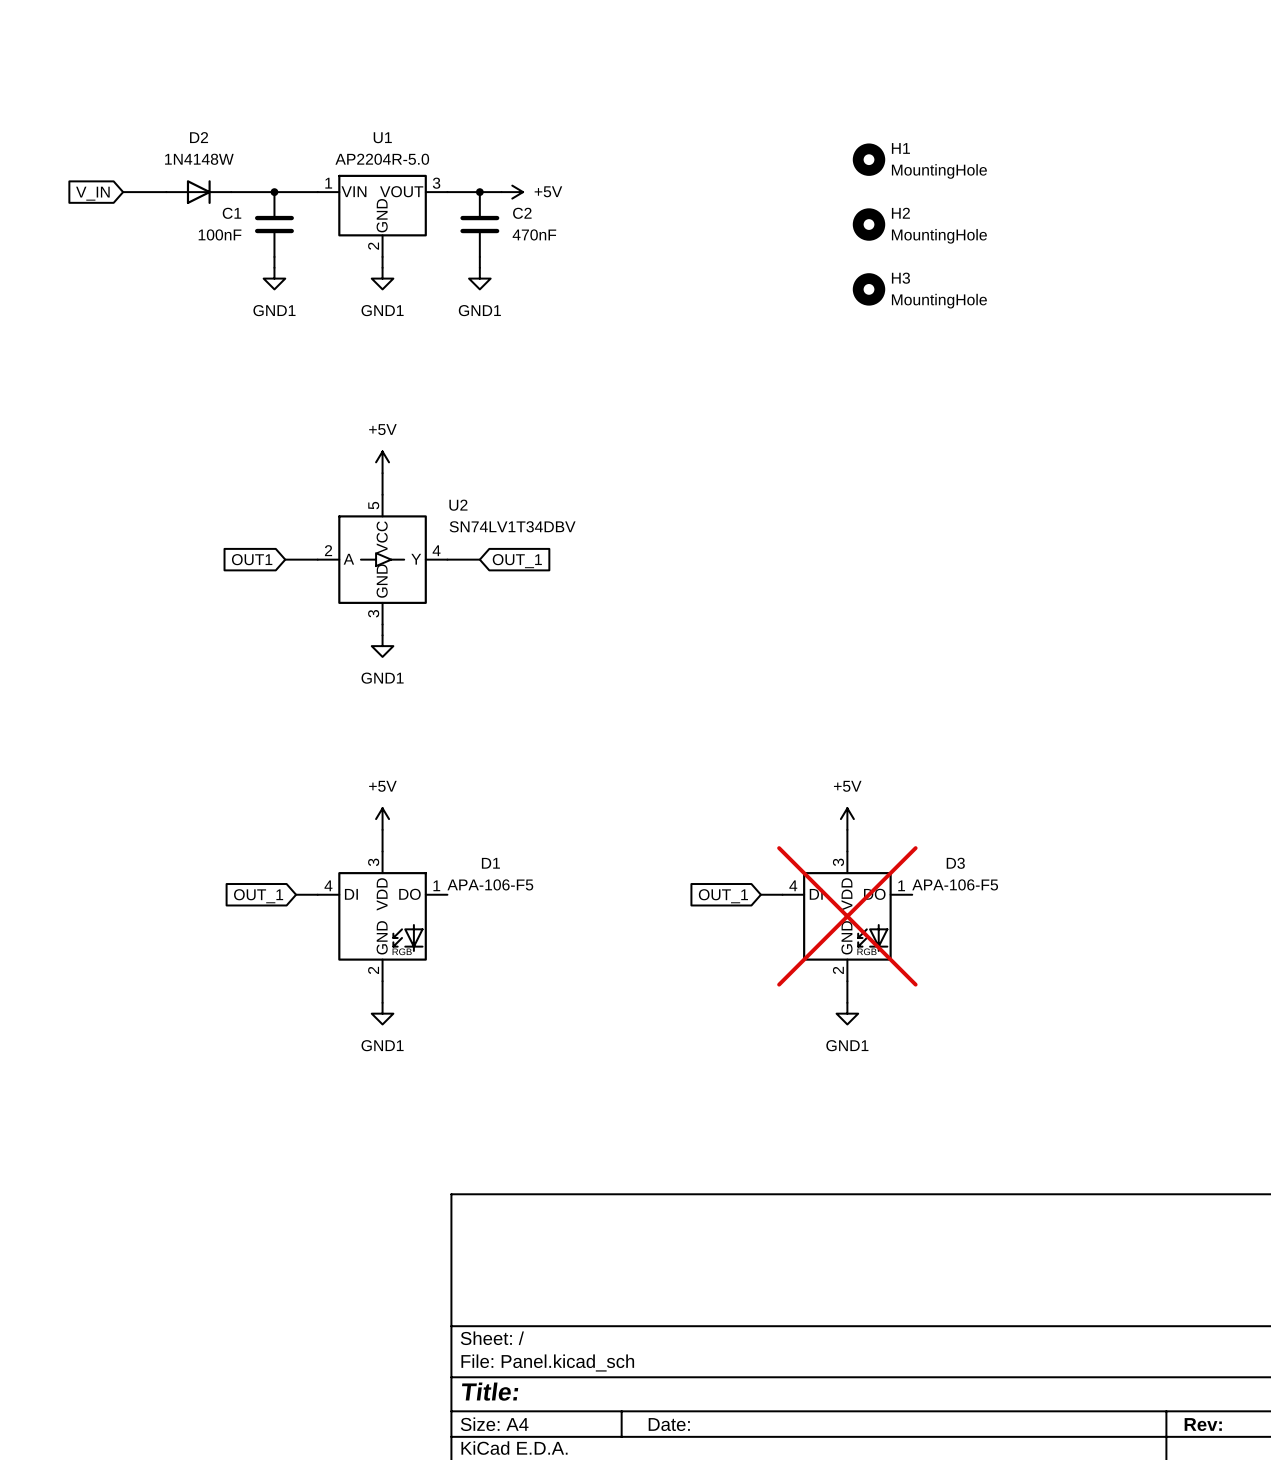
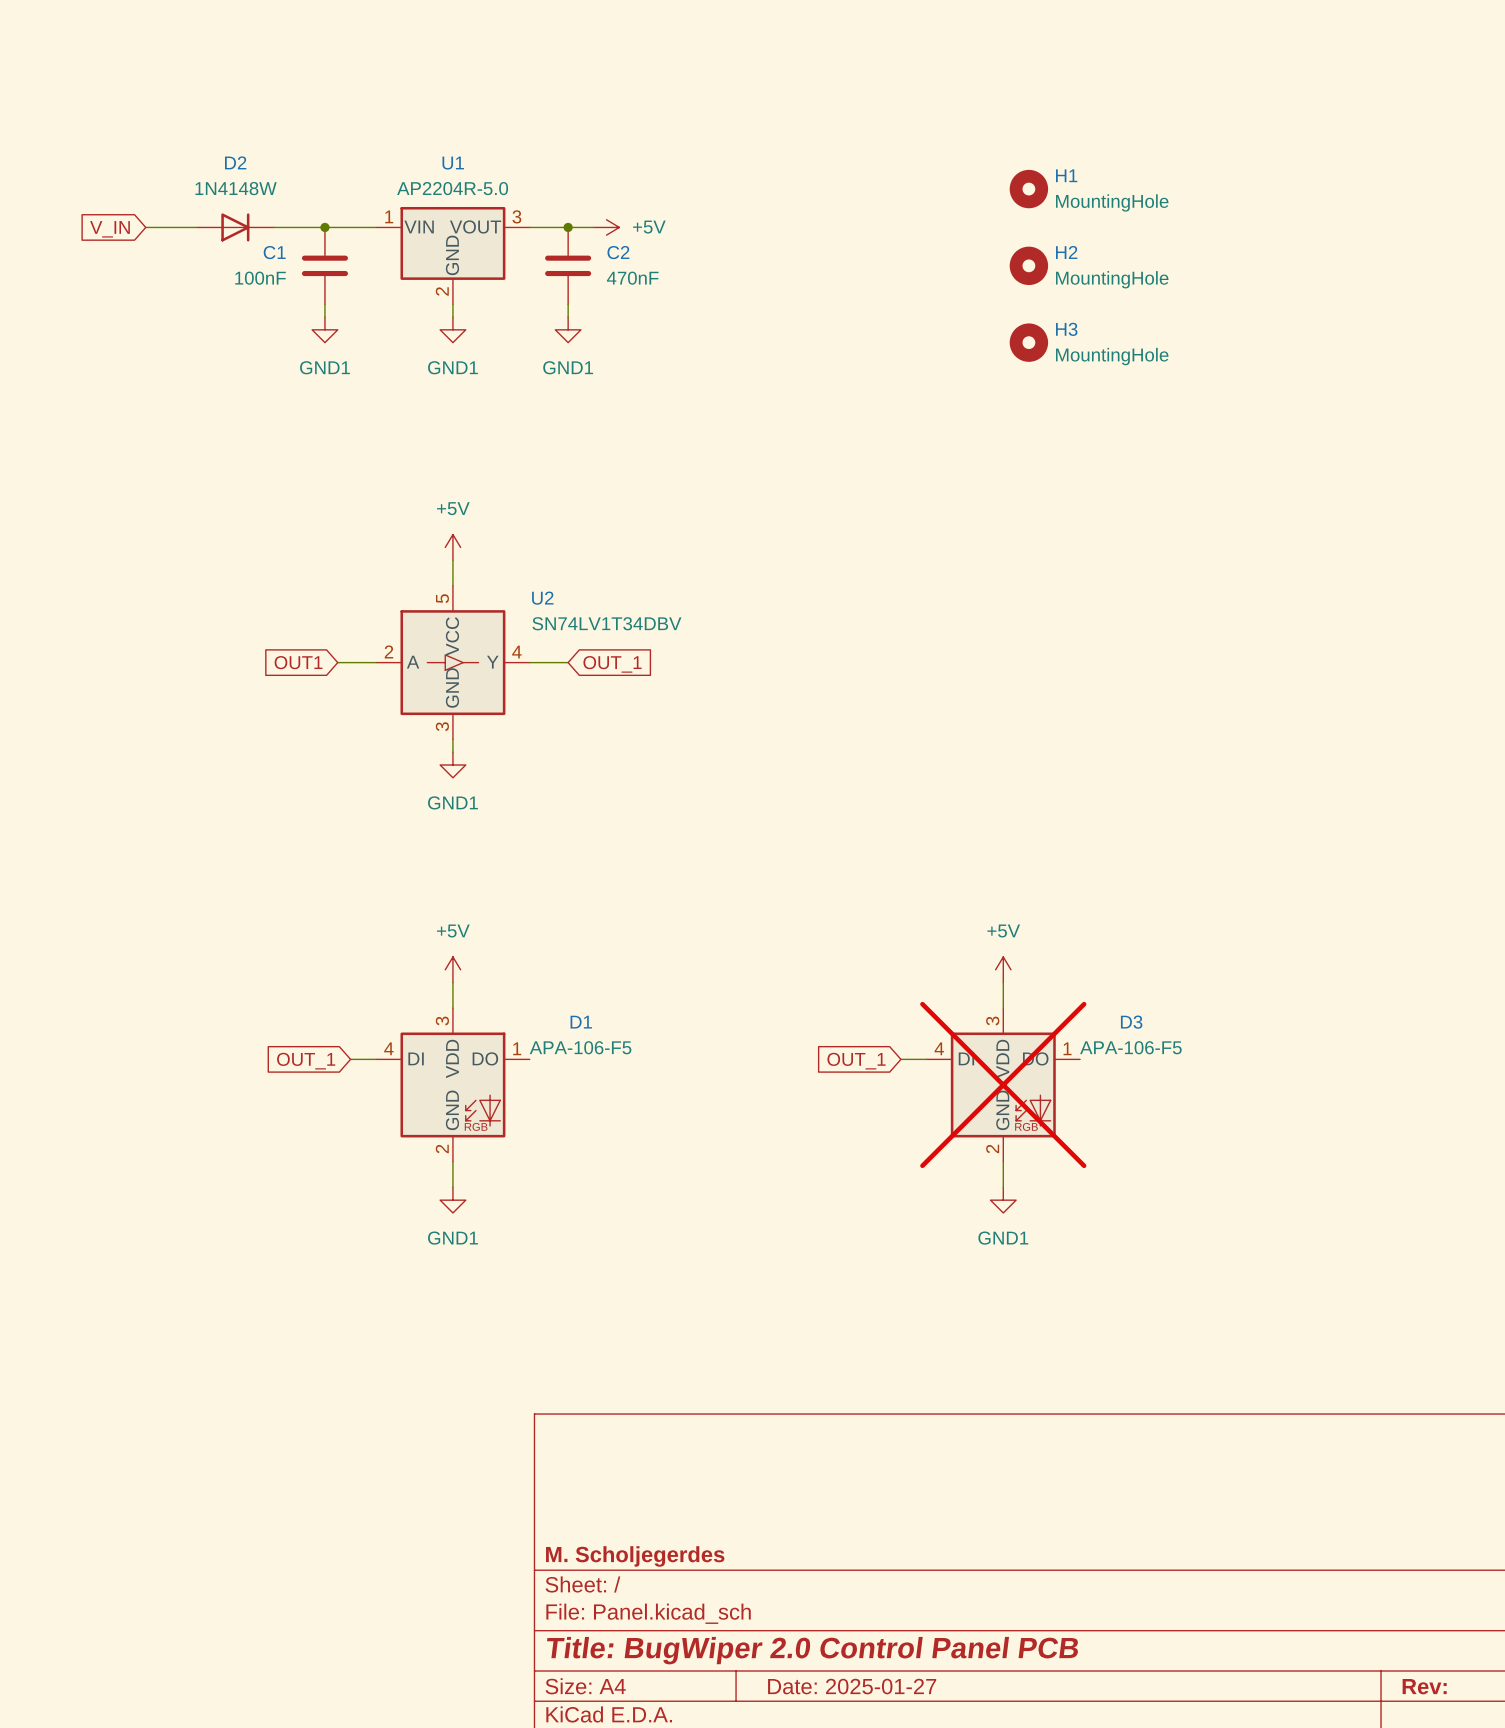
title block: none -> M. Scholjegerdes (635, 1556)
title block: Title: (490, 1391) -> Title: BugWiper 2.0 Control Panel PCB (812, 1650)
title block: Date: (669, 1424) -> Date: 2025-01-27 (852, 1686)

